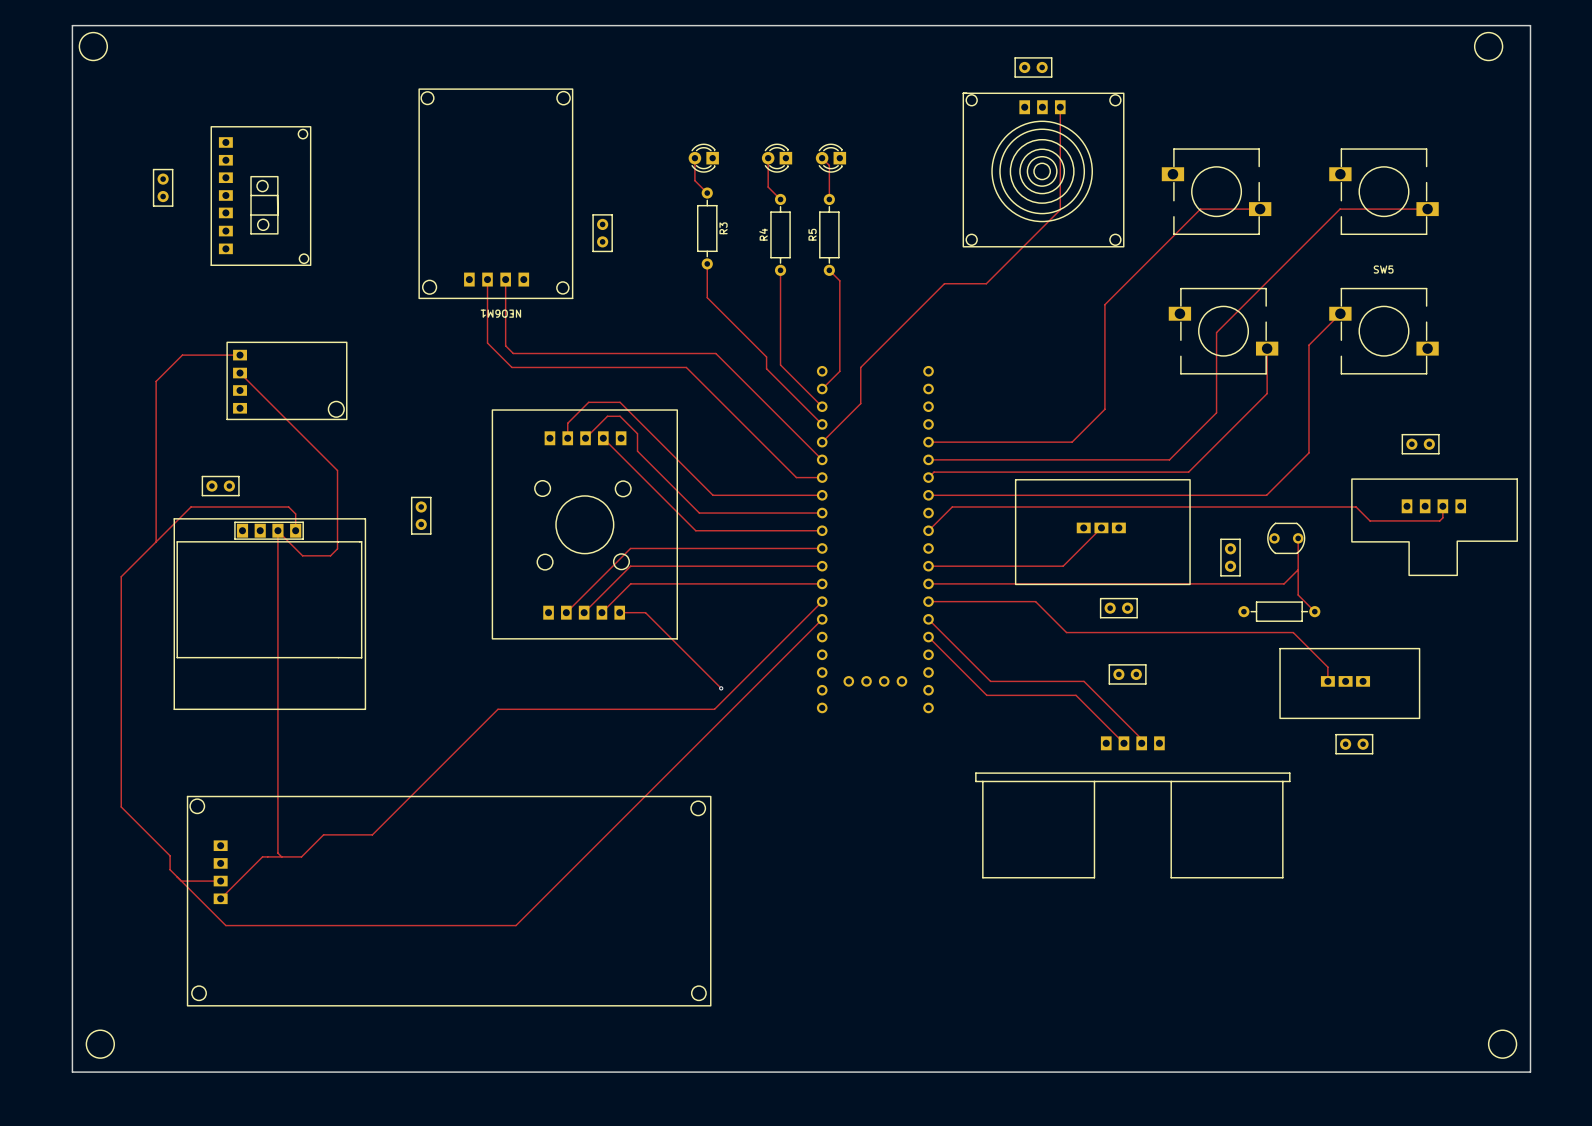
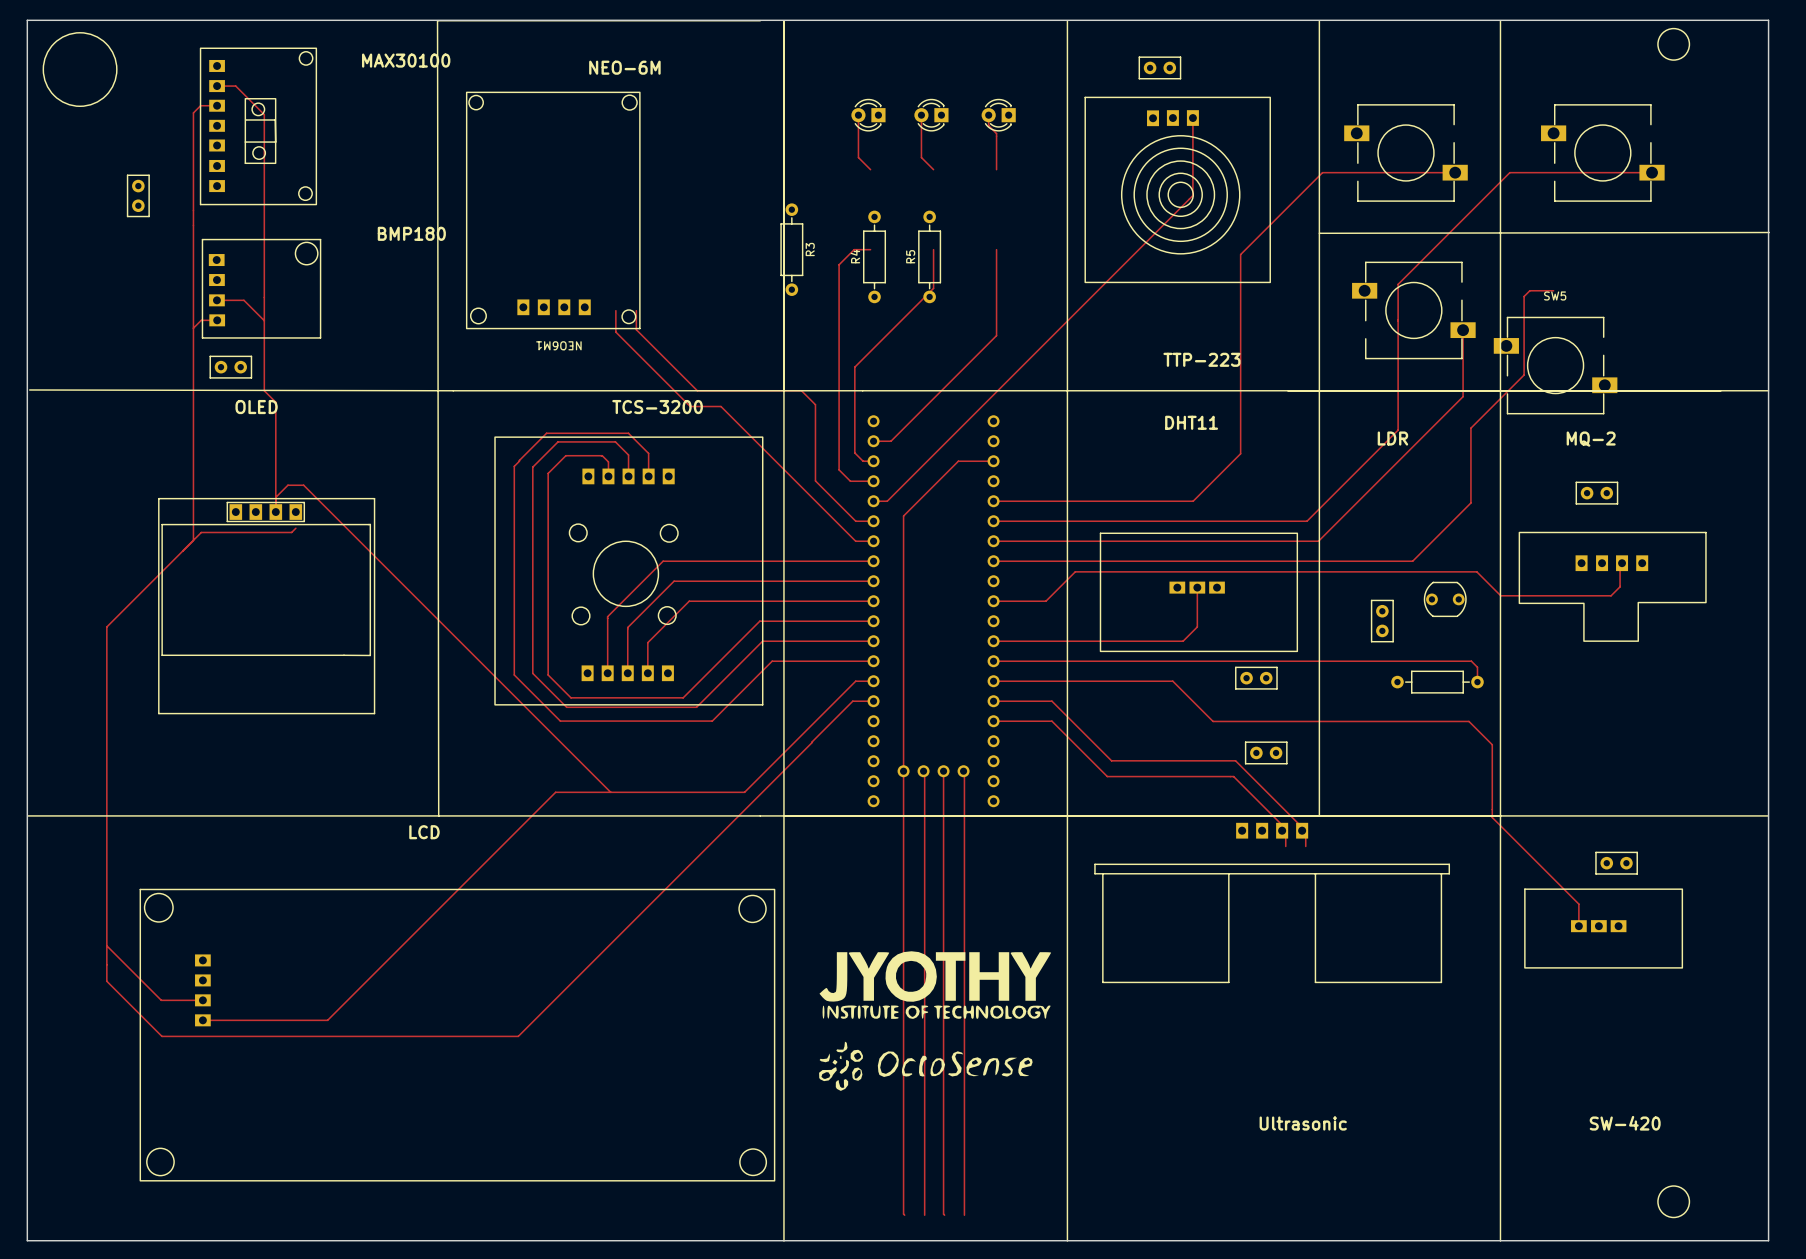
board edge: (72, 25) (1530, 25) (1530, 1072) (72, 1072) (72, 25) -> (27, 20) (27, 1240) (1768, 1240) (1768, 20) (27, 20)
line: none -> (760, 20) (437, 20) (438, 816)
line: none -> (783, 20) (783, 1241)
line: none -> (1067, 20) (1067, 1241)
line: none -> (1319, 20) (1319, 815)
line: none -> (1500, 20) (1500, 1241)
drawing: [79, 32, 108, 61] -> none
drawing: none -> [42, 32, 118, 107]
text: none -> MAX30100 (406, 60)
text: none -> NEO-6M (624, 67)
track: none -> (217, 86) (235, 86) (264, 114) (264, 390) (275, 402) (275, 512)
track: none -> (217, 105) (200, 105) (193, 112) (193, 540)
track: (1060, 107) (1060, 209) (986, 283) (944, 283) (860, 367) (860, 403) (822, 442) -> none
track: none -> (858, 115) (858, 157) (870, 169)
part: none -> (868, 115)
track: none -> (921, 115) (921, 157) (933, 169)
part: none -> (931, 115)
track: none -> (988, 115) (988, 125) (996, 133) (996, 169)
part: none -> (998, 115)
track: none -> (1192, 118) (1192, 195) (887, 501) (873, 501)
part: none -> (258, 126)
part: none -> (1405, 152)
track: (694, 158) (694, 180) (707, 193) -> none
part: (703, 158) -> none
track: (768, 158) (768, 187) (780, 199) -> none
part: (777, 158) -> none
track: (822, 158) (829, 165) (829, 199) -> none
part: (830, 158) -> none
track: none -> (1652, 172) (1509, 172) (1398, 284) (1398, 430) (1307, 521) (993, 521)
part: (1043, 170) -> none
part: none -> (1177, 189)
part position: (163, 187) -> (138, 195)
part: (1216, 191) -> none
part position: (1383, 191) -> (1602, 152)
part: (260, 196) -> none
track: (1260, 209) (1200, 209) (1104, 304) -> (1455, 172) (1322, 172) (1240, 254) (1240, 335)
track: (1427, 209) (1340, 209) (1216, 332) (1216, 412) (1169, 459) (928, 459) -> none
line: none -> (1769, 232) (1319, 233)
text: none -> BMP180 (411, 233)
track: none -> (870, 249) (854, 249) (839, 264) (839, 469) (850, 481) (873, 481)
track: none -> (933, 249) (933, 288) (854, 367) (854, 452) (863, 461) (873, 461)
track: none -> (996, 249) (996, 335) (890, 441) (873, 441)
part: (602, 233) -> none
part: none -> (261, 288)
track: (707, 263) (707, 297) (766, 357) (766, 368) (822, 424) -> none
track: (780, 270) (780, 365) (822, 406) -> none
track: (829, 270) (839, 280) (839, 371) (822, 388) -> none
track: none -> (216, 300) (243, 300) (264, 320)
track: (487, 279) (487, 343) (511, 367) (617, 367) -> (615, 310) (615, 332) (690, 406)
track: (505, 279) (505, 345) (513, 353) (623, 353) -> (636, 310) (636, 329) (697, 390)
part: none -> (1413, 310)
track: none -> (217, 320) (201, 320) (193, 328)
track: (1340, 313) (1308, 345) (1308, 386) -> (1553, 290) (1529, 290) (1524, 296) (1524, 375) (1470, 428)
text: none -> TTP-223 (1201, 359)
part: (1223, 331) -> none
part: none -> (230, 367)
track: (1267, 348) (1267, 393) -> (1463, 330) (1463, 396) (1423, 436)
line: none -> (29, 389) (1768, 390)
track: (240, 355) (182, 355) (156, 381) (156, 541) -> none
track: (728, 365) (822, 459) -> (815, 404) (815, 480) (855, 521) (873, 521)
text: none -> OLED (256, 407)
text: none -> TCS-3200 (657, 407)
track: (644, 367) (686, 367) (796, 477) (822, 477) -> (720, 406) (855, 541) (873, 541)
track: (240, 373) (337, 470) (337, 548) (330, 555) (302, 555) (277, 531) -> none
part: (286, 380) -> none
text: none -> DHT11 (1191, 422)
text: none -> LDR (1392, 438)
text: none -> MQ-2 (1591, 439)
track: none -> (993, 461) (958, 461) (903, 516) (904, 1215)
track: none -> (608, 476) (608, 461) (602, 455) (565, 455) (548, 473) (548, 675) (570, 697) (683, 697) (759, 621) (873, 621)
track: none -> (628, 476) (628, 455) (615, 441) (558, 441) (532, 467) (532, 673) (566, 707) (696, 707) (762, 641) (873, 641)
track: none -> (648, 476) (648, 453) (628, 433) (546, 433) (514, 466) (514, 675) (560, 721) (712, 721) (772, 661) (873, 661)
track: (567, 438) (567, 423) (588, 402) (620, 402) (713, 495) (822, 495) -> none
track: (585, 438) (607, 416) (620, 416) (637, 433) (637, 451) (699, 513) (822, 513) -> none
track: (603, 438) (695, 530) (822, 530) -> none
track: (928, 442) (1072, 442) -> (993, 501) (1193, 501) (1203, 490)
track: none -> (275, 497) (287, 485) (303, 485) (610, 792)
track: (1188, 472) (934, 472) (928, 477) -> (1335, 524) (1318, 541) (993, 541)
part: (220, 486) -> none
track: (928, 495) (1266, 495) -> (993, 561) (1412, 561) (1423, 550)
track: none -> (873, 561) (663, 561) (607, 618)
track: (1442, 506) (1442, 517) (1439, 520) (1370, 520) (1356, 506) (952, 506) (928, 530) -> none
track: none -> (1620, 564) (1620, 586) (1611, 595) (1500, 595) (1476, 571) (1075, 571) (1045, 601) (993, 601)
part: none -> (628, 570)
part: (421, 515) -> none
track: none -> (873, 581) (674, 581) (627, 627) (627, 673)
part: (584, 524) -> none
track: (1101, 527) (1066, 562) -> (1197, 587) (1197, 626)
track: (277, 530) (277, 853) (281, 856) -> none
track: (295, 530) (295, 513) (288, 506) (191, 506) (121, 576) (121, 806) (170, 855) (170, 869) (225, 925) -> (295, 528) (291, 532) (201, 532) (106, 626) (106, 981) (161, 1036) (248, 1036)
part position: (1102, 532) -> (1198, 592)
track: (1298, 538) (1298, 595) (1314, 611) -> (993, 661) (1471, 661) (1477, 667) (1477, 682)
track: none -> (873, 601) (689, 601) (647, 642) (647, 673)
part position: (875, 539) -> (933, 611)
track: (822, 548) (630, 548) (566, 612) -> none
track: none -> (607, 618) (607, 673)
track: (822, 566) (630, 566) (584, 612) -> none
track: (928, 566) (1063, 566) -> (993, 641) (1183, 641) (1193, 630)
track: (1298, 569) (1284, 583) (928, 583) -> none
track: (822, 583) (630, 583) (601, 612) -> none
track: (822, 601) (714, 709) (665, 709) -> (873, 681) (855, 681) (744, 792)
track: (928, 601) (1035, 601) (1044, 610) -> (993, 681) (1172, 681)
track: (619, 612) (645, 612) (721, 688) -> none
part position: (269, 614) -> (266, 606)
track: (822, 619) (515, 925) (464, 925) -> (873, 701) (852, 701) (518, 1036)
track: (928, 619) (937, 628) -> (993, 701) (1051, 701)
track: (1066, 632) (1293, 632) (1307, 646) -> (1197, 705) (1213, 721) (1468, 721)
track: (928, 637) (937, 646) -> (993, 721) (1051, 721)
track: (1084, 681) (1141, 739) (1141, 743) -> (1217, 760) (1235, 760) (1305, 830) (1305, 846)
track: none -> (1492, 760) (1492, 817) (1578, 904) (1578, 926)
part position: (1349, 683) -> (1603, 928)
via: (721, 688) -> none
track: none -> (923, 771) (924, 1215)
track: none -> (943, 771) (944, 1215)
track: none -> (963, 771) (964, 1215)
track: (1076, 695) (1123, 743) -> (1208, 776) (1233, 776) (1285, 828) (1285, 846)
line: none -> (28, 815) (1768, 815)
text: none -> LCD (424, 832)
part position: (1354, 744) -> (1616, 863)
track: (372, 834) (323, 834) (301, 856) (262, 856) (220, 898) -> (413, 934) (327, 1020) (202, 1020)
track: none -> (106, 945) (161, 1000) (202, 1000)
drawing: none -> [819, 951, 1052, 1019]
track: (181, 881) (220, 881) -> none
part: (449, 901) -> none
part: none -> (457, 1035)
drawing: none -> [819, 1041, 1033, 1091]
text: none -> Ultrasonic (1303, 1123)
text: none -> SW-420 (1625, 1123)
drawing: [86, 1029, 115, 1059] -> none
drawing position: (1502, 1044) -> (1673, 1201)

